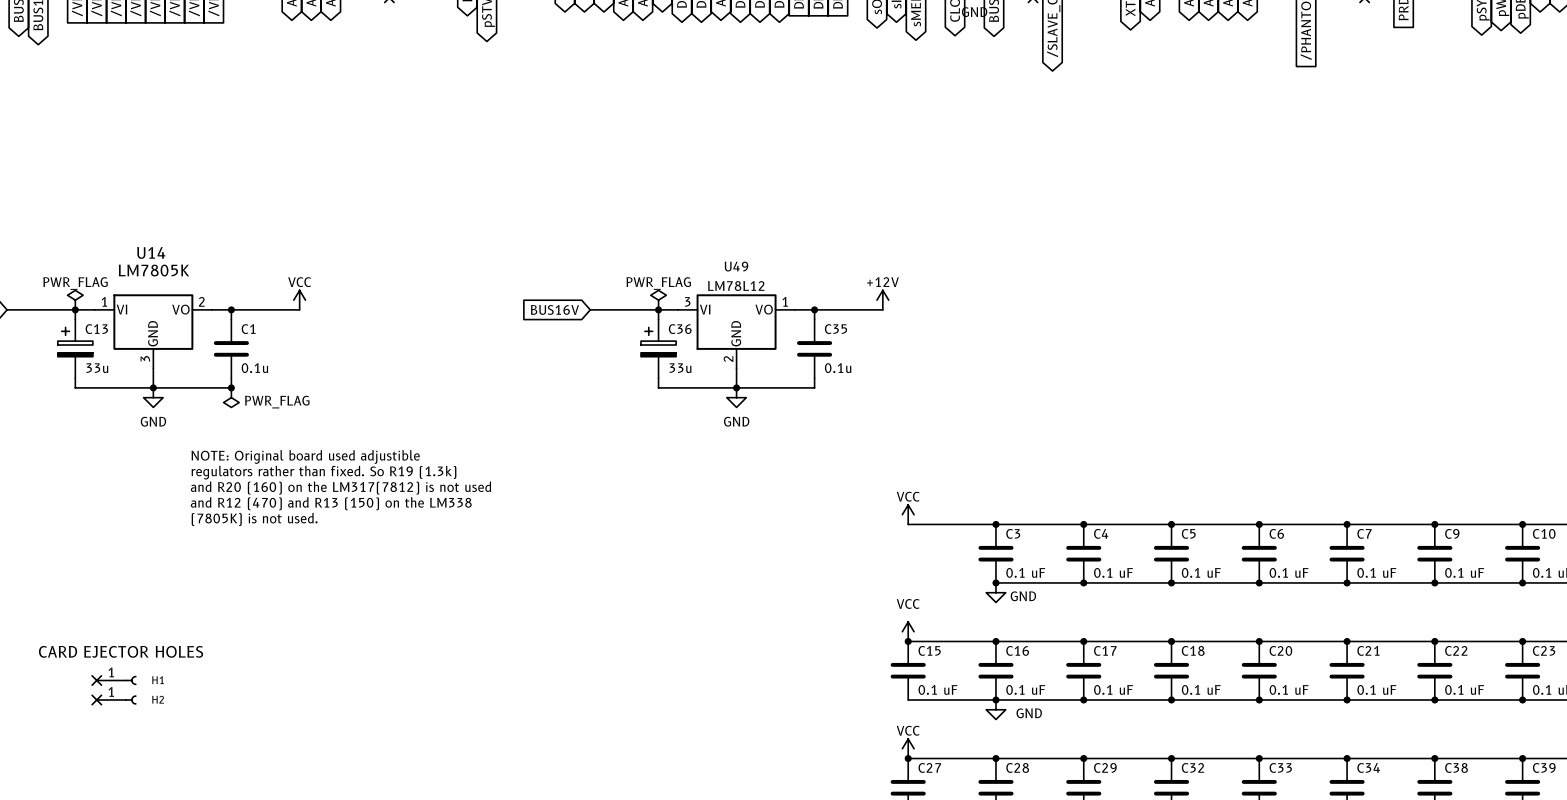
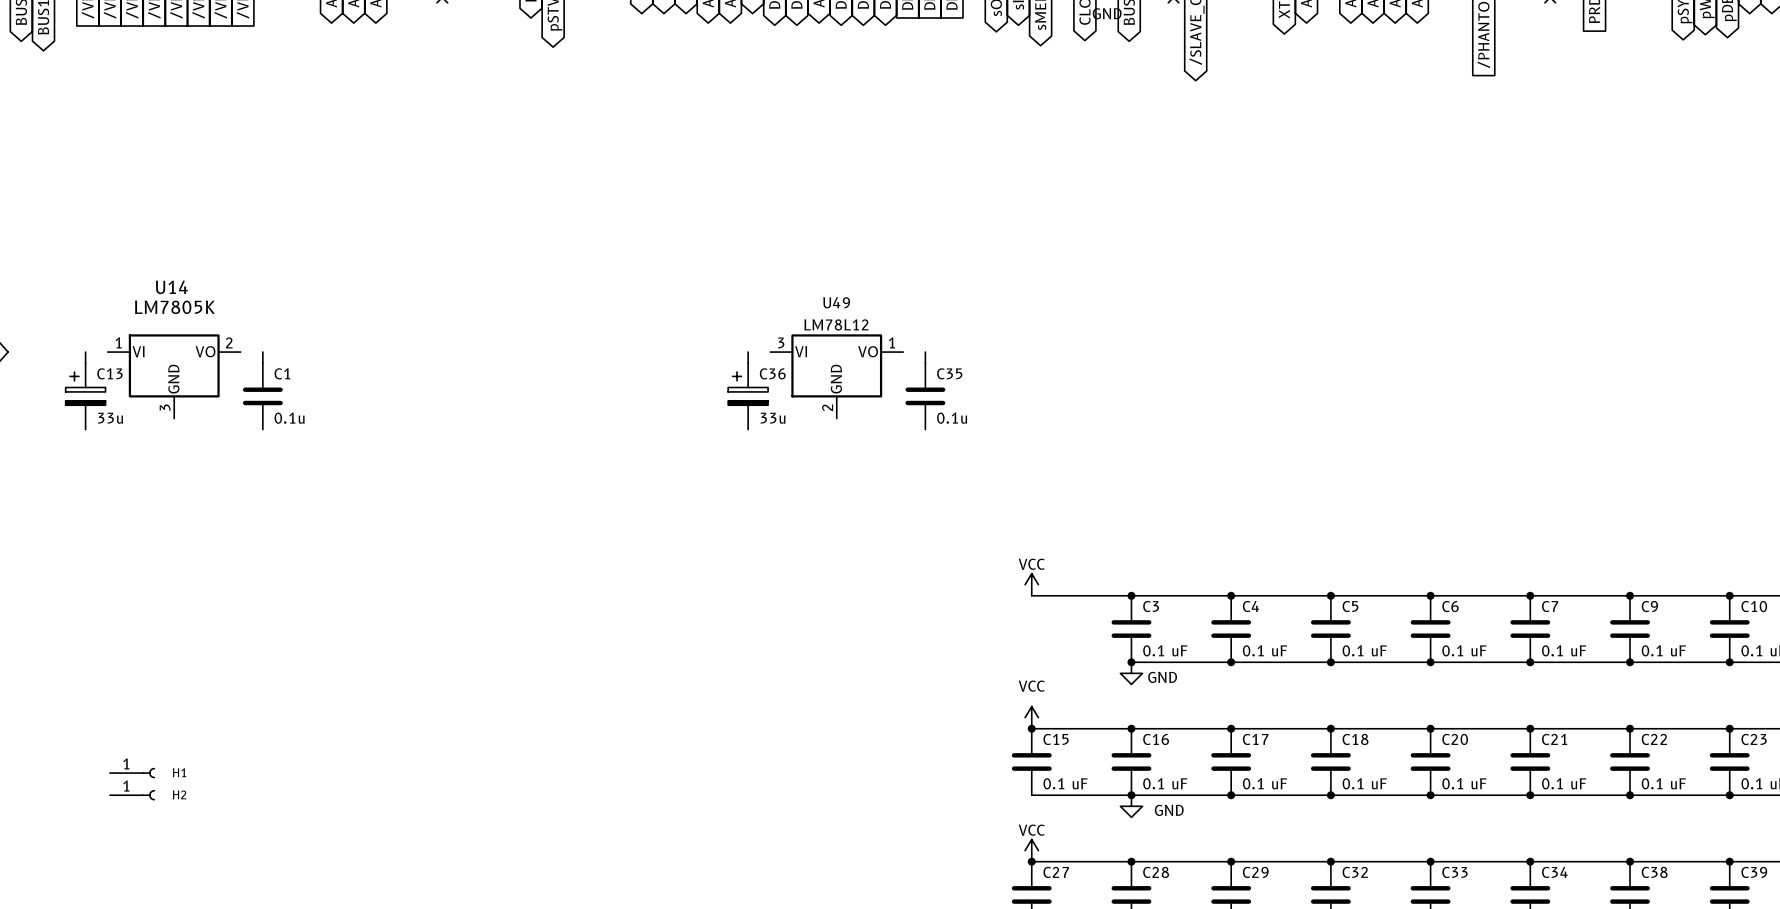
power symbol: PWR_FLAG (75, 300) -> none
power symbol: VCC (299, 300) -> none
power symbol: PWR_FLAG (658, 300) -> none
power symbol: +12V (882, 300) -> none
wire: (7, 309) (94, 309) -> none
junction: (75, 309) -> none
wire: (211, 309) (299, 309) -> none
junction: (231, 309) -> none
global label: BUS16V (554, 309) -> none
wire: (590, 309) (678, 309) -> none
junction: (658, 309) -> none
wire: (795, 309) (882, 309) -> none
junction: (814, 309) -> none
wire: (153, 368) (153, 387) -> none
wire: (736, 368) (736, 387) -> none
wire: (75, 378) (75, 387) (231, 387) (231, 378) -> none
wire: (658, 378) (658, 387) (814, 387) (814, 378) -> none
junction: (153, 387) -> none
junction: (231, 387) -> none
junction: (736, 387) -> none
power symbol: GND (153, 397) -> none
power symbol: PWR_FLAG (231, 397) -> none
power symbol: GND (736, 397) -> none
text: NOTE: Original board used adjustible (305, 456) -> none
text: regulators rather than fixed. So R19 (1.3k) (324, 472) -> none
text: and R20 (160) on the LM317(7812) is not used (341, 488) -> none
text: and R12 (470) and R13 (150) on the LM338 (331, 503) -> none
text: (7805K) is not used. (254, 519) -> none
text: CARD EJECTOR HOLES (121, 651) -> none
no-connect mark: (96, 680) -> none
no-connect mark: (96, 699) -> none

